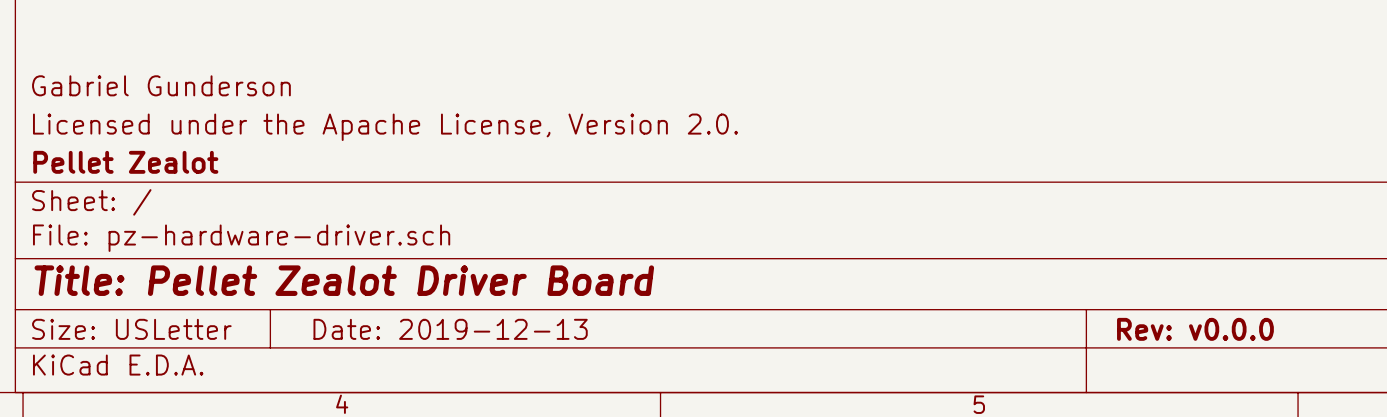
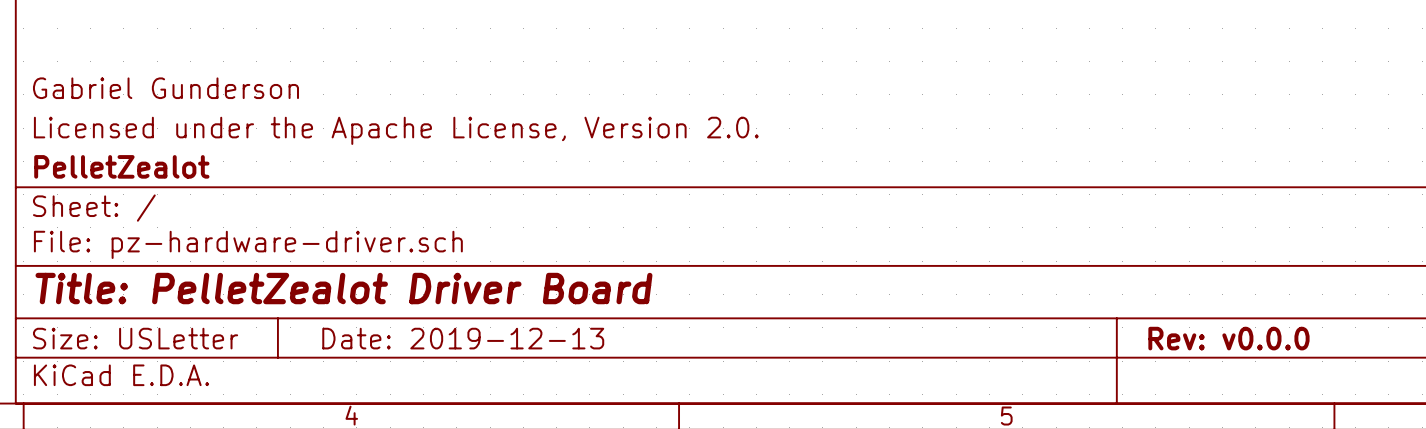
title block: Pellet Zealot (125, 162) -> PelletZealot (121, 166)
title block: Title: Pellet Zealot Driver Board (344, 280) -> Title: PelletZealot Driver Board (343, 288)

